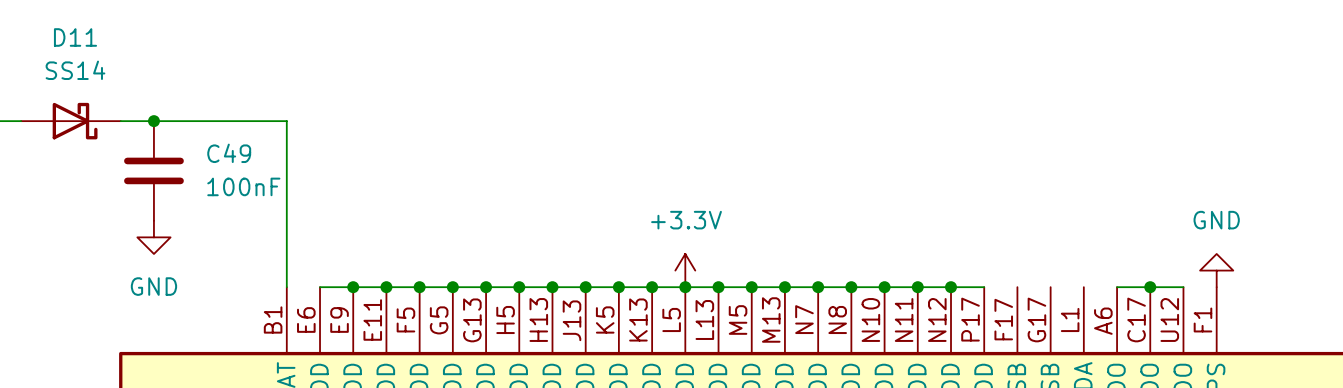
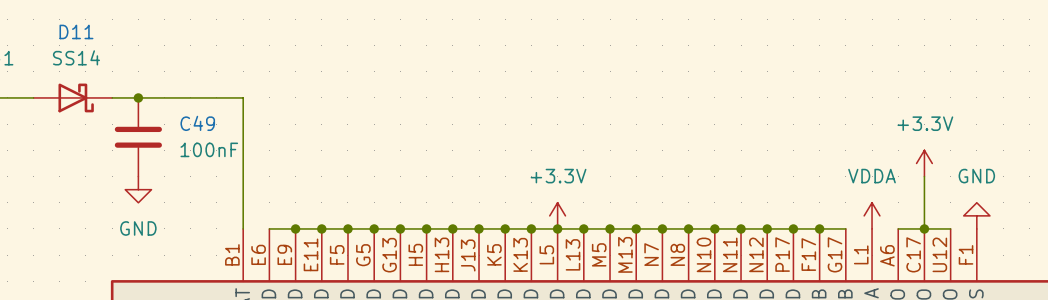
power symbol: none -> +3.3V (924, 163)
wire: none -> (924, 176) (924, 228)
power symbol: none -> VDDA (872, 215)
wire: none -> (793, 228) (845, 228)
junction: none -> (793, 228)
junction: none -> (819, 228)

